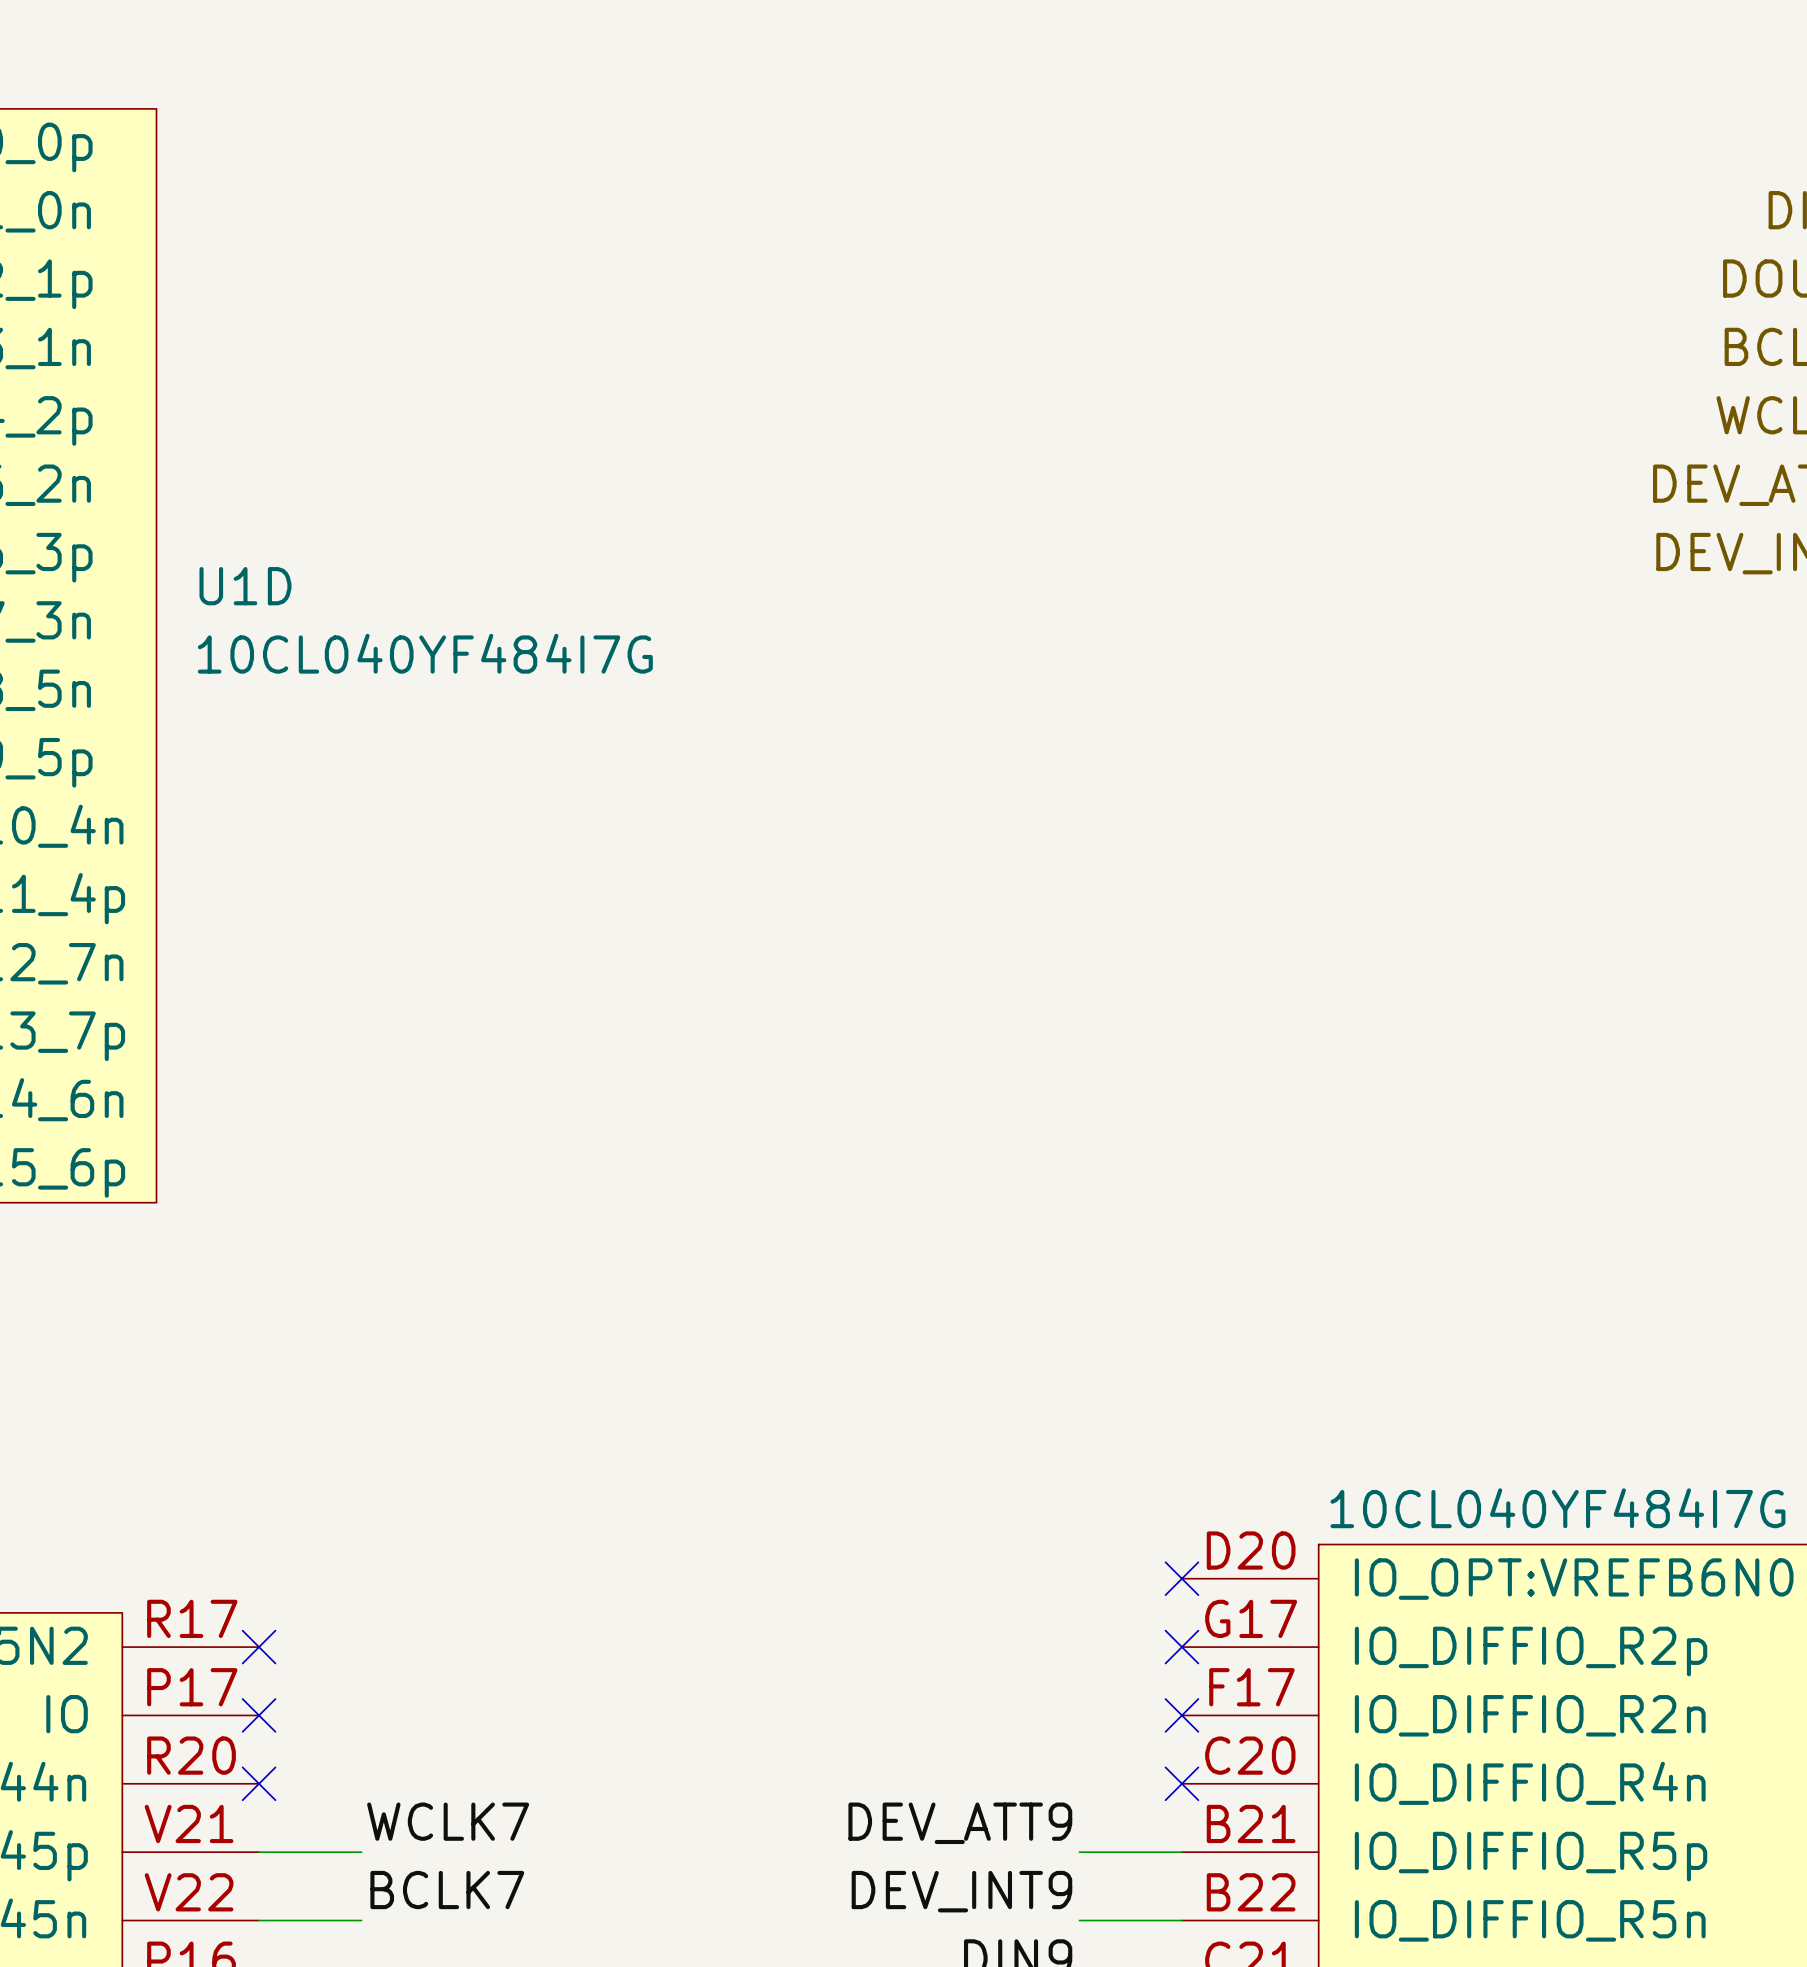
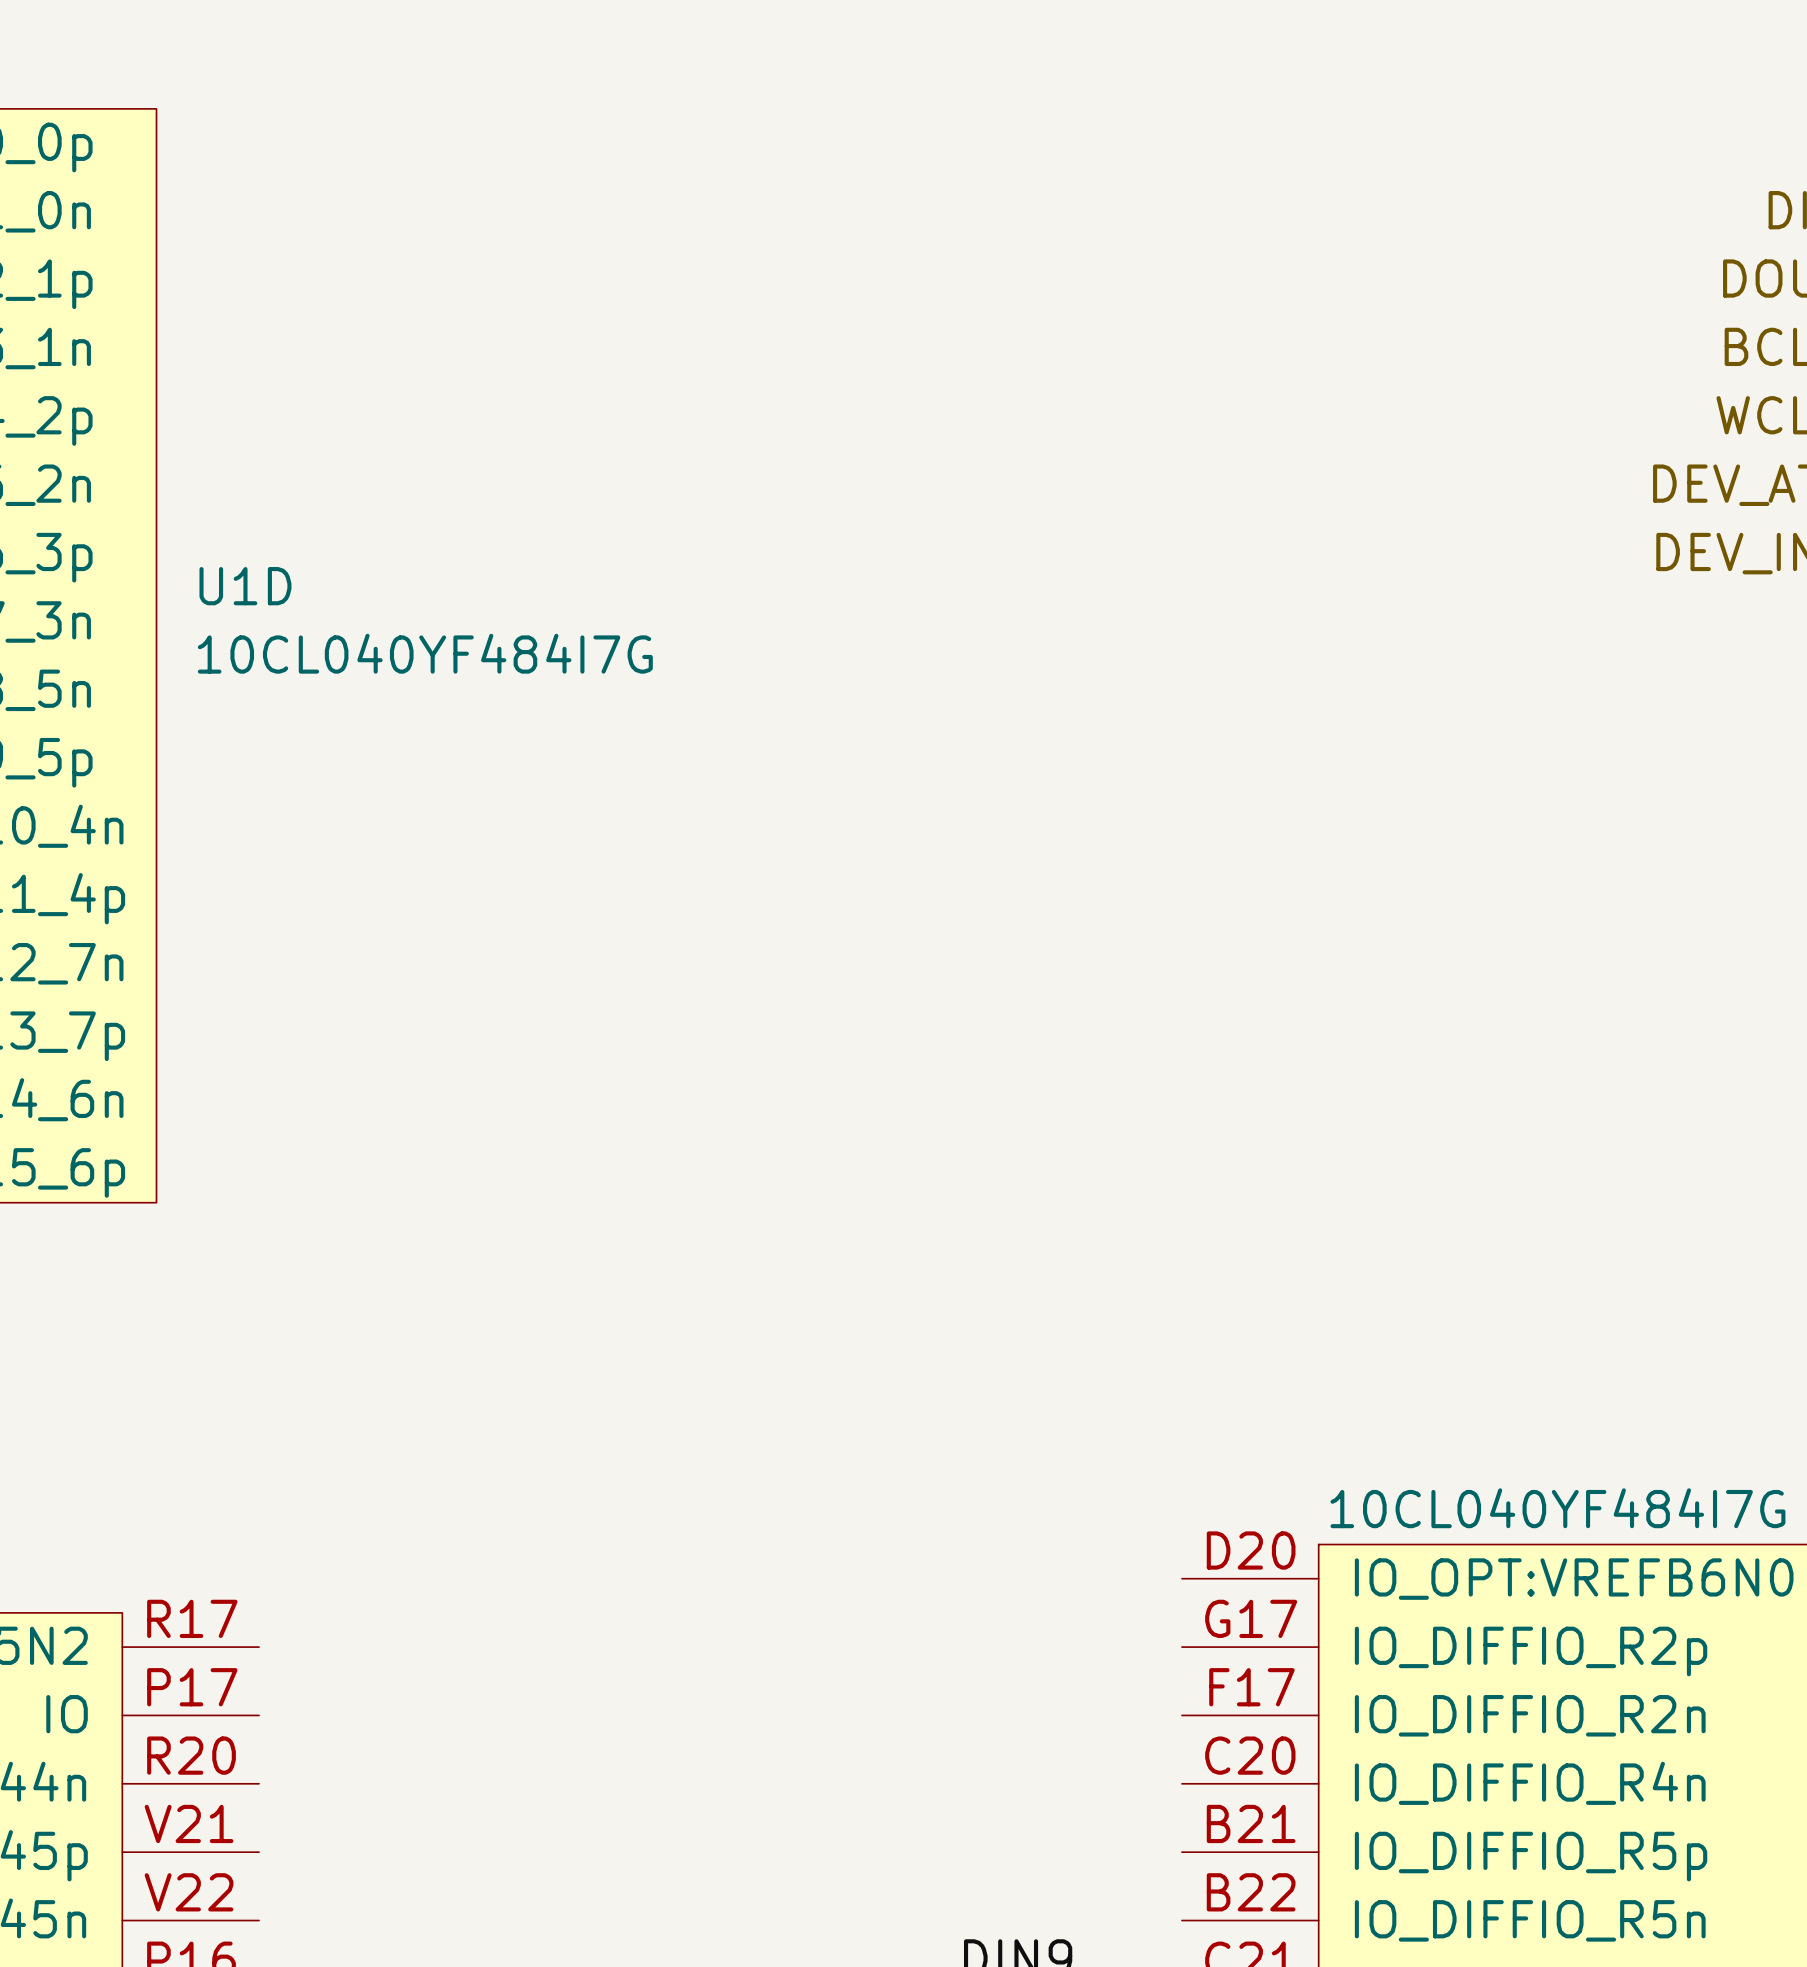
no-connect mark: (1181, 1578) -> none
no-connect mark: (259, 1647) -> none
no-connect mark: (1181, 1647) -> none
no-connect mark: (259, 1715) -> none
no-connect mark: (1181, 1715) -> none
no-connect mark: (259, 1783) -> none
no-connect mark: (1181, 1783) -> none
label: WCLK7 (448, 1821) -> none
label: DEV_ATT9 (960, 1823) -> none
wire: (259, 1852) (361, 1852) -> none
wire: (1079, 1852) (1181, 1852) -> none
label: BCLK7 (447, 1890) -> none
label: DEV_INT9 (961, 1891) -> none
wire: (259, 1920) (361, 1920) -> none
wire: (1079, 1920) (1181, 1920) -> none

